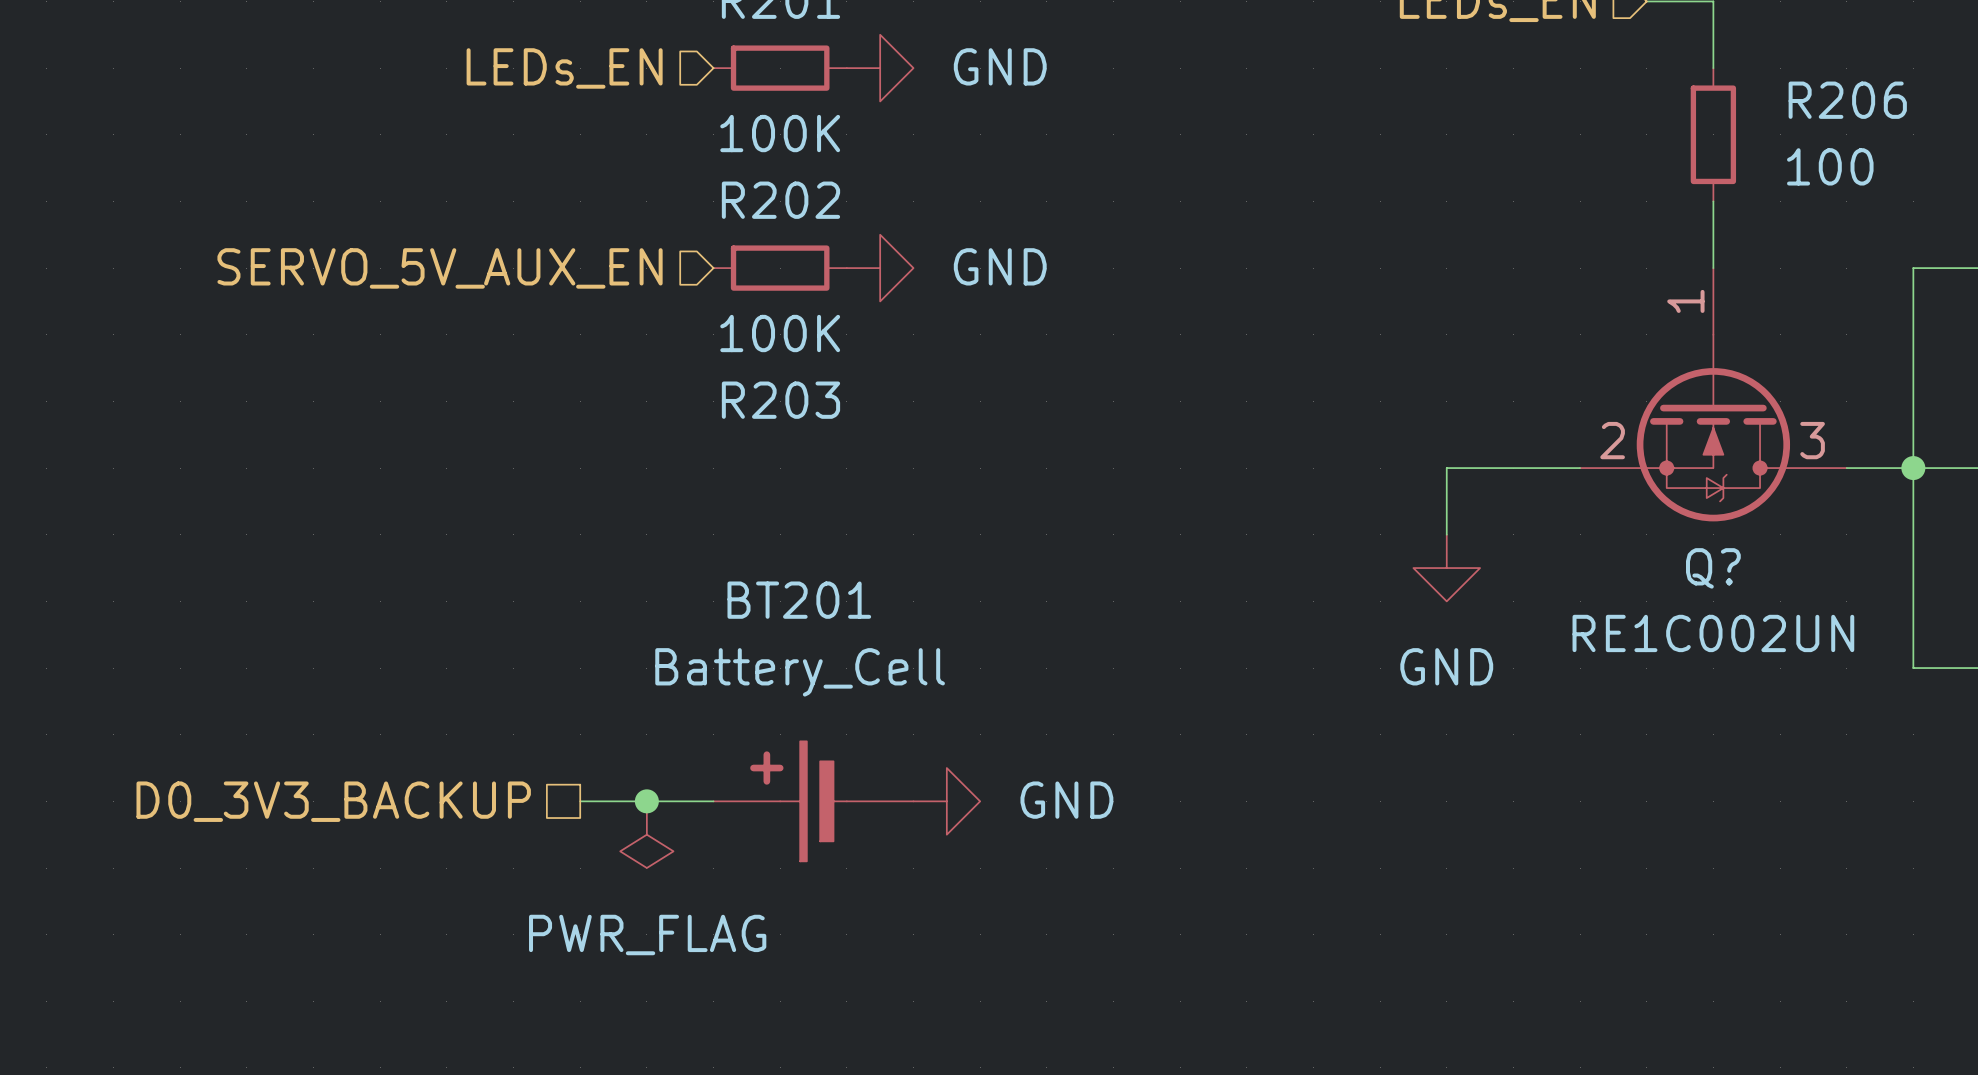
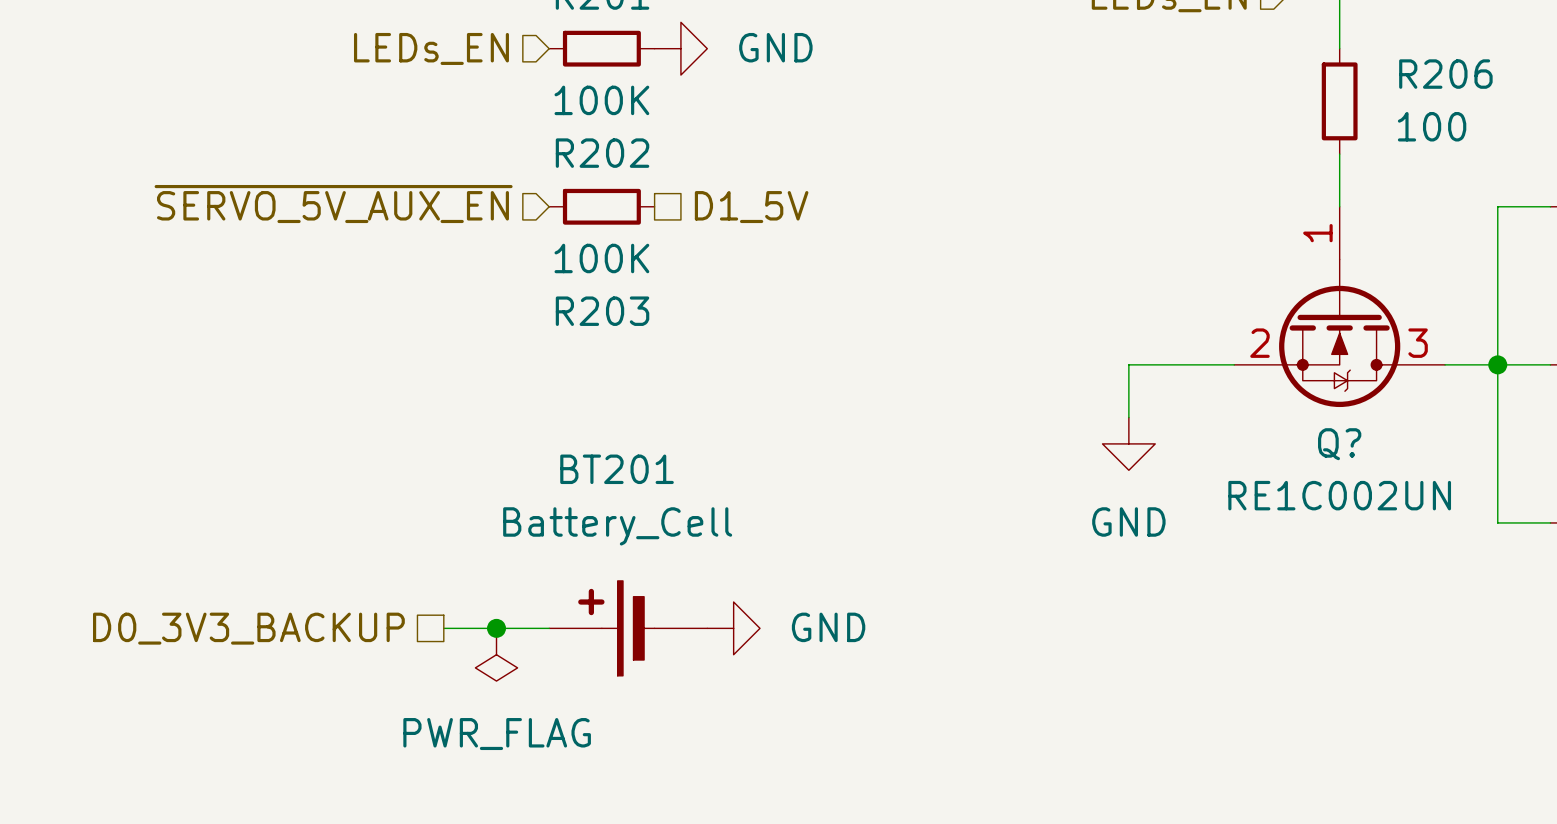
hierarchical label: SERVO_5V_AUX_EN (440, 268) -> ~{SERVO_5V_AUX_EN} (333, 204)
power symbol: GND (880, 268) -> none
hierarchical label: none -> D1_5V (751, 207)

